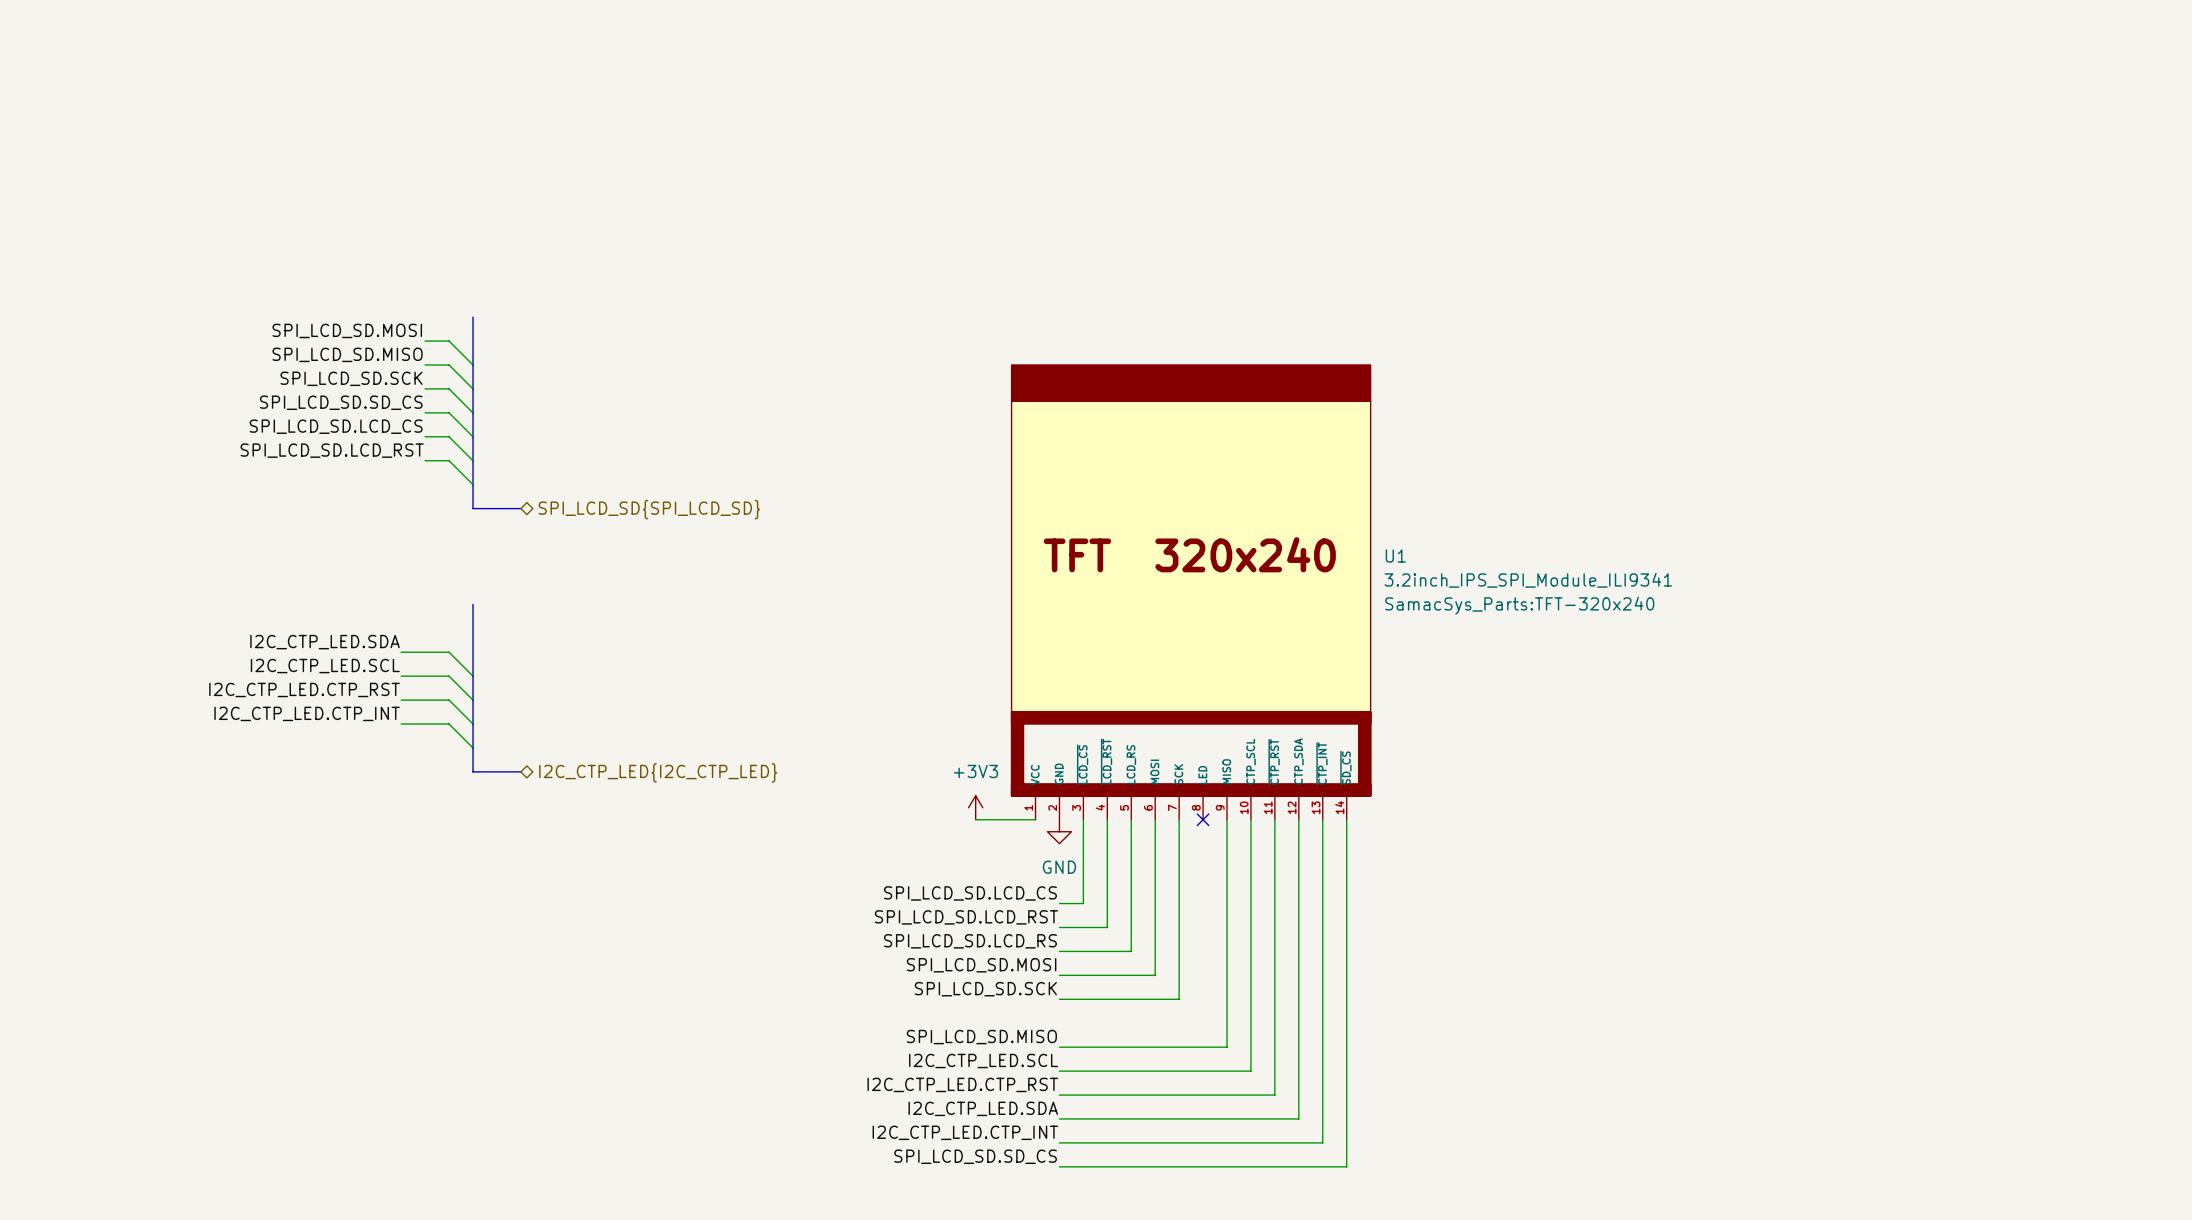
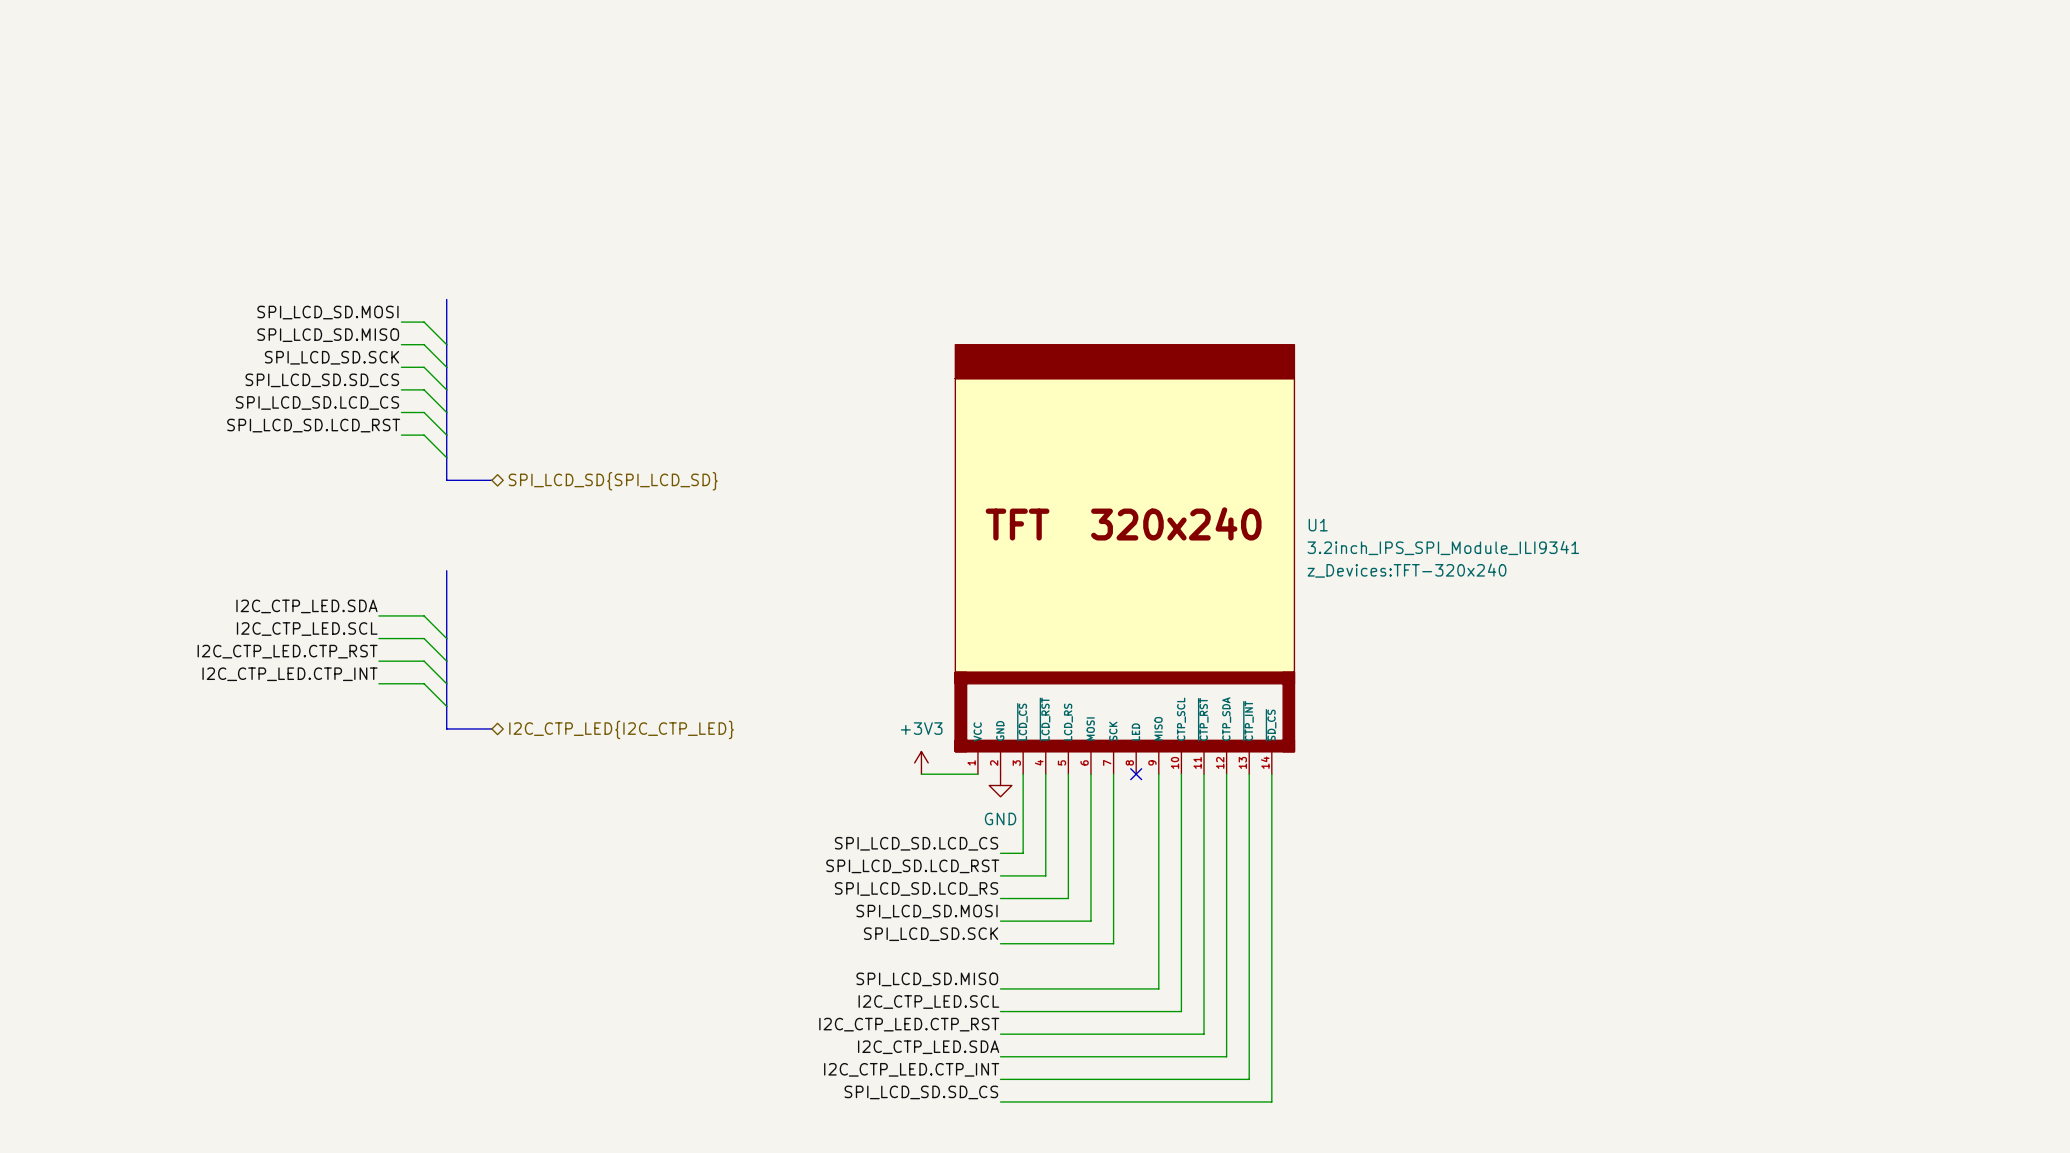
U1 text: SamacSys_Parts:TFT-320x240 (1519, 605) -> z_Devices:TFT-320x240 (1407, 570)

